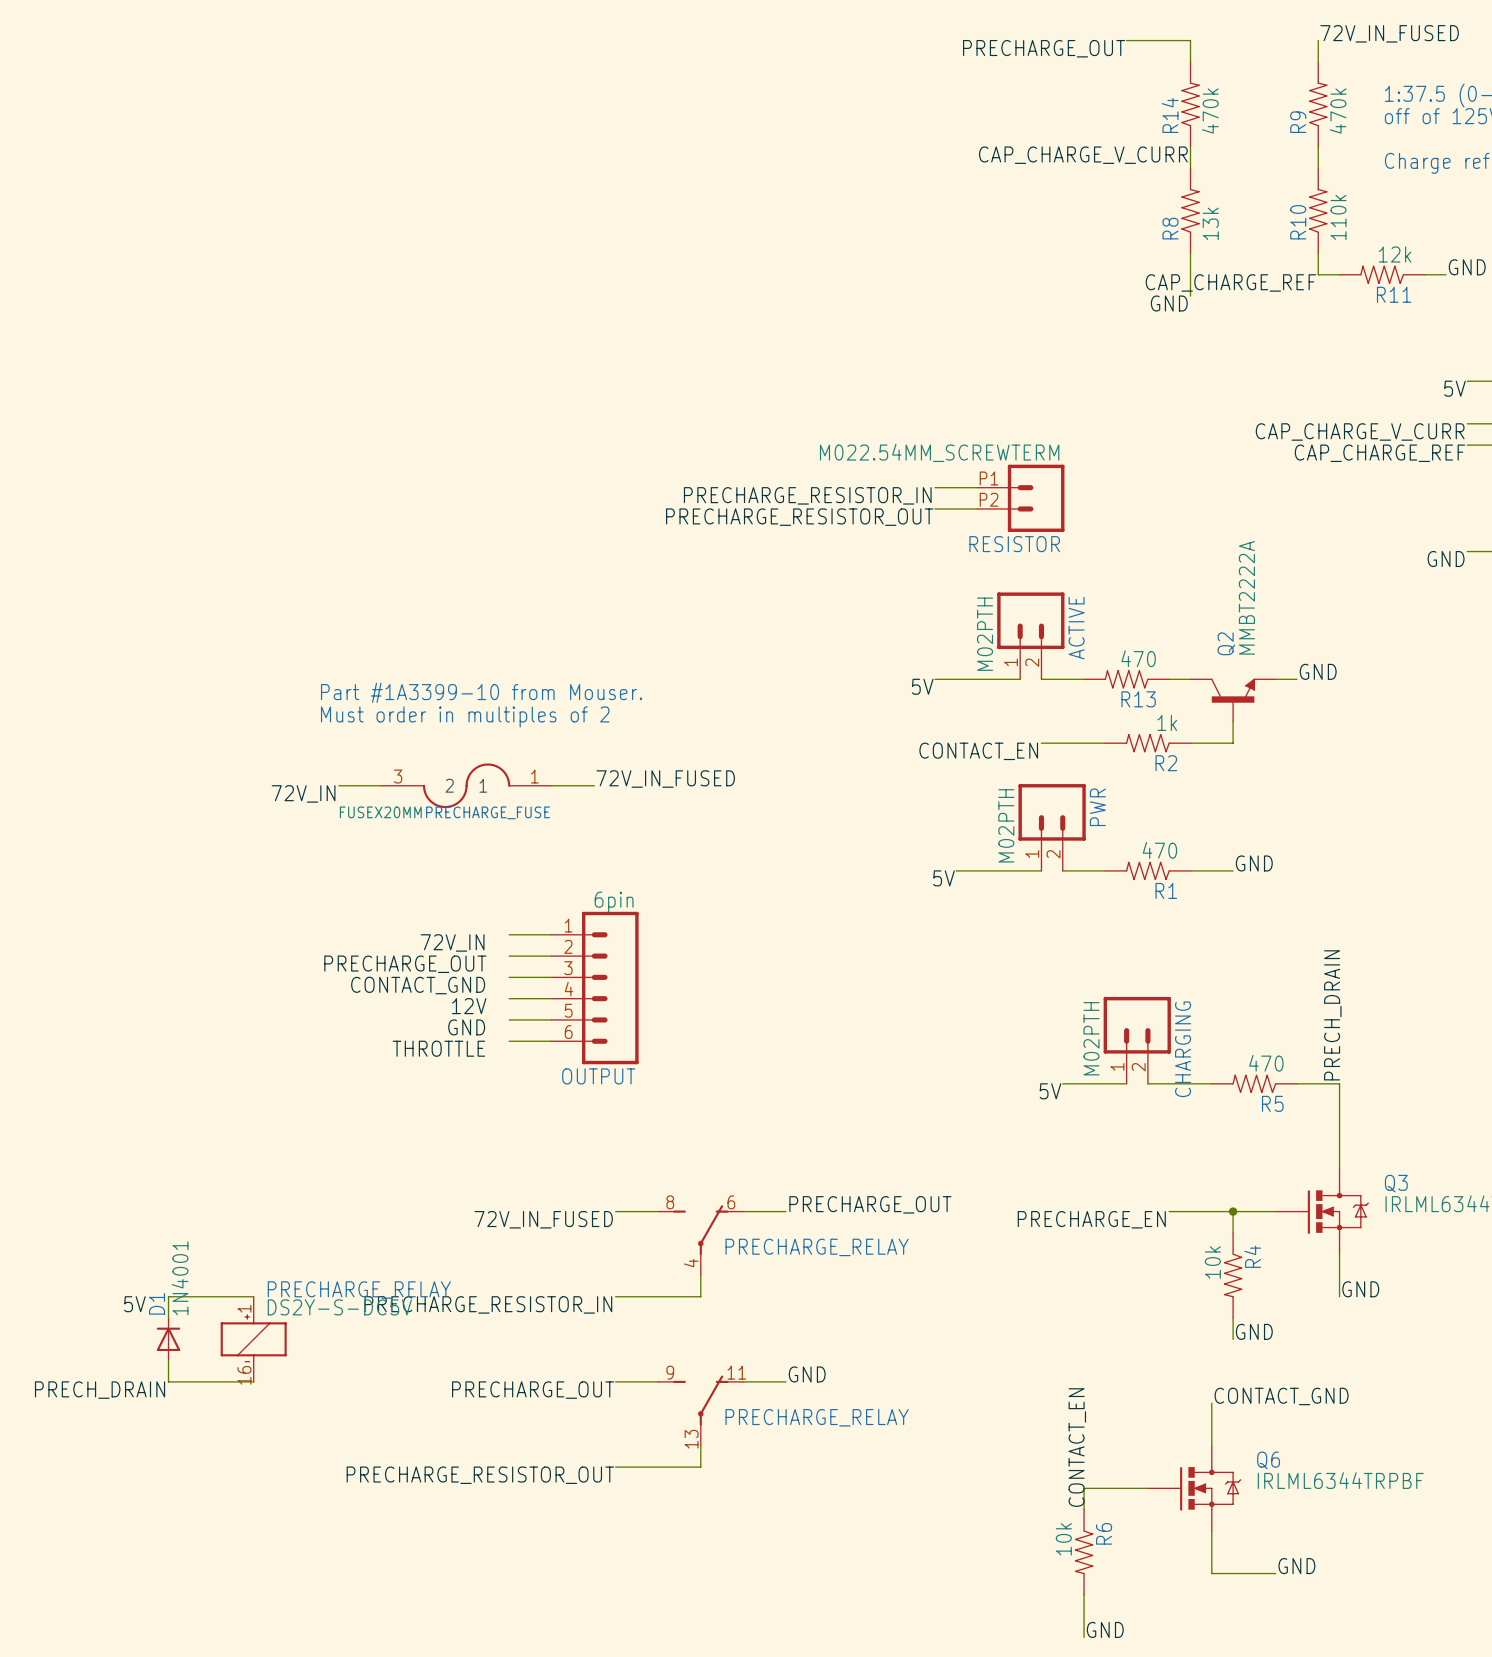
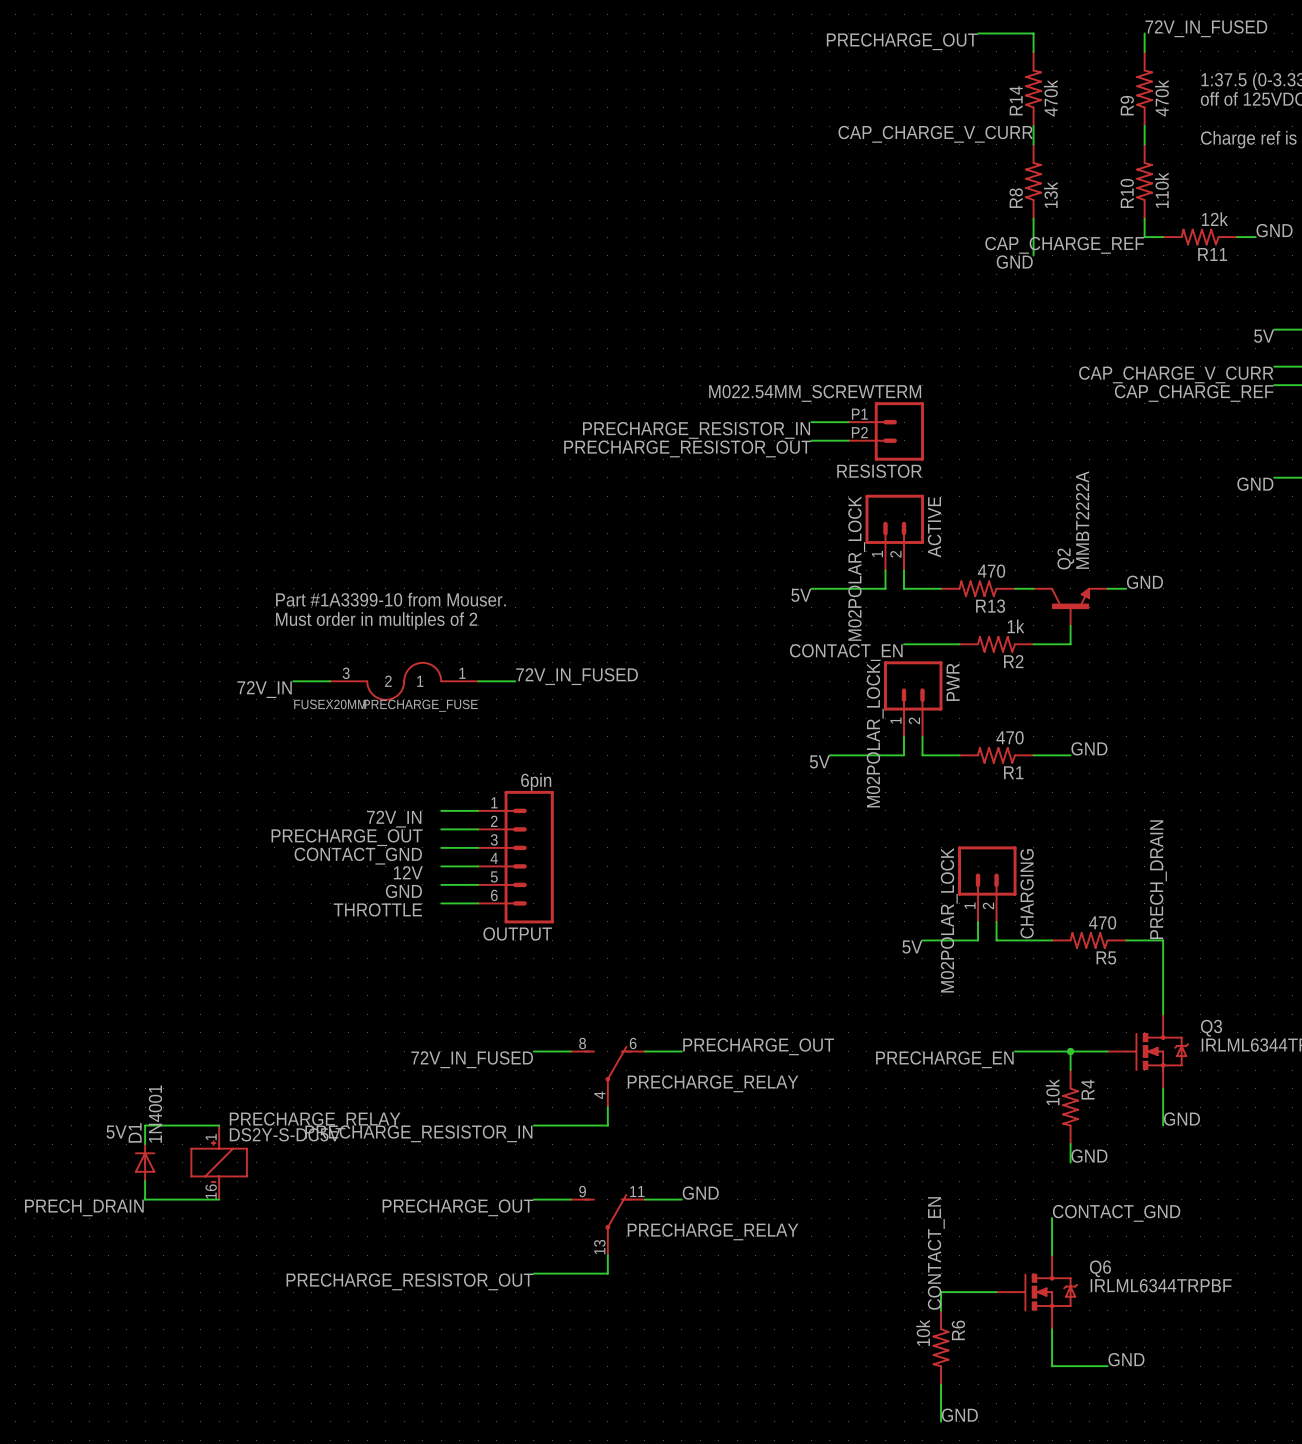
ACTIVE: none -> M02POLAR_LOCK (894, 532)
ACTIVE: M02PTH (1030, 635) -> none
PWR: none -> M02POLAR_LOCK (913, 699)
PWR: M02PTH (1052, 827) -> none
CHARGING: none -> M02POLAR_LOCK (987, 884)
CHARGING: M02PTH (1137, 1040) -> none

